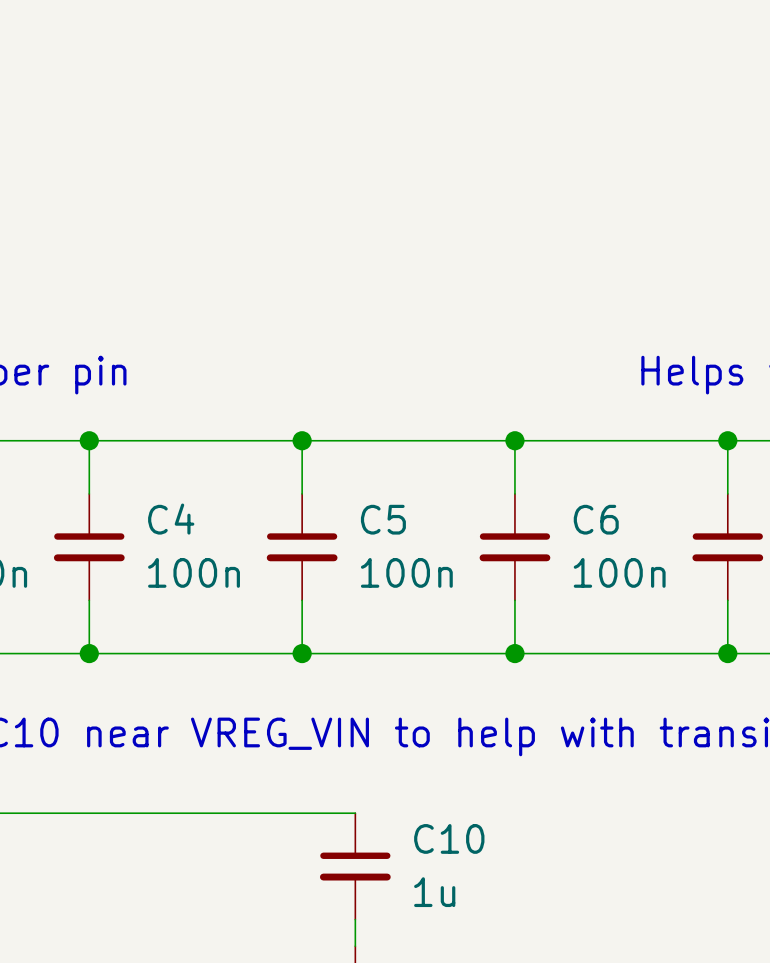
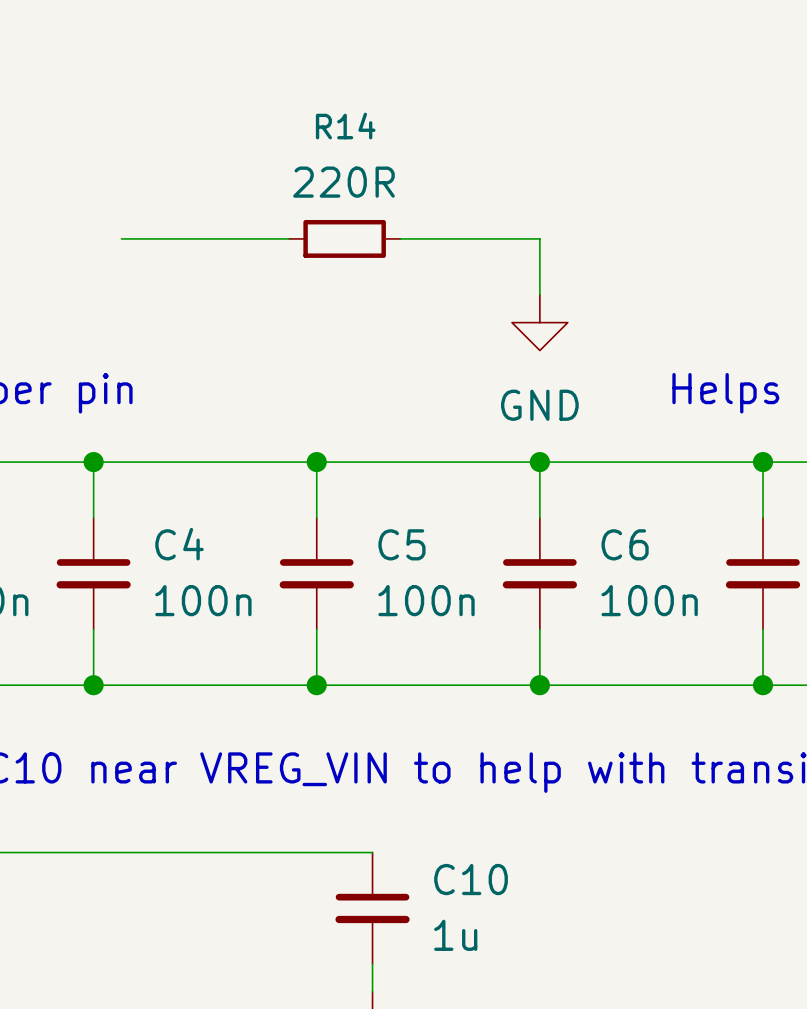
wire: none -> (121, 238) (288, 238)
R14: none -> 220R (344, 238)
wire: none -> (400, 238) (539, 238) (539, 294)
power symbol: none -> GND (539, 322)

